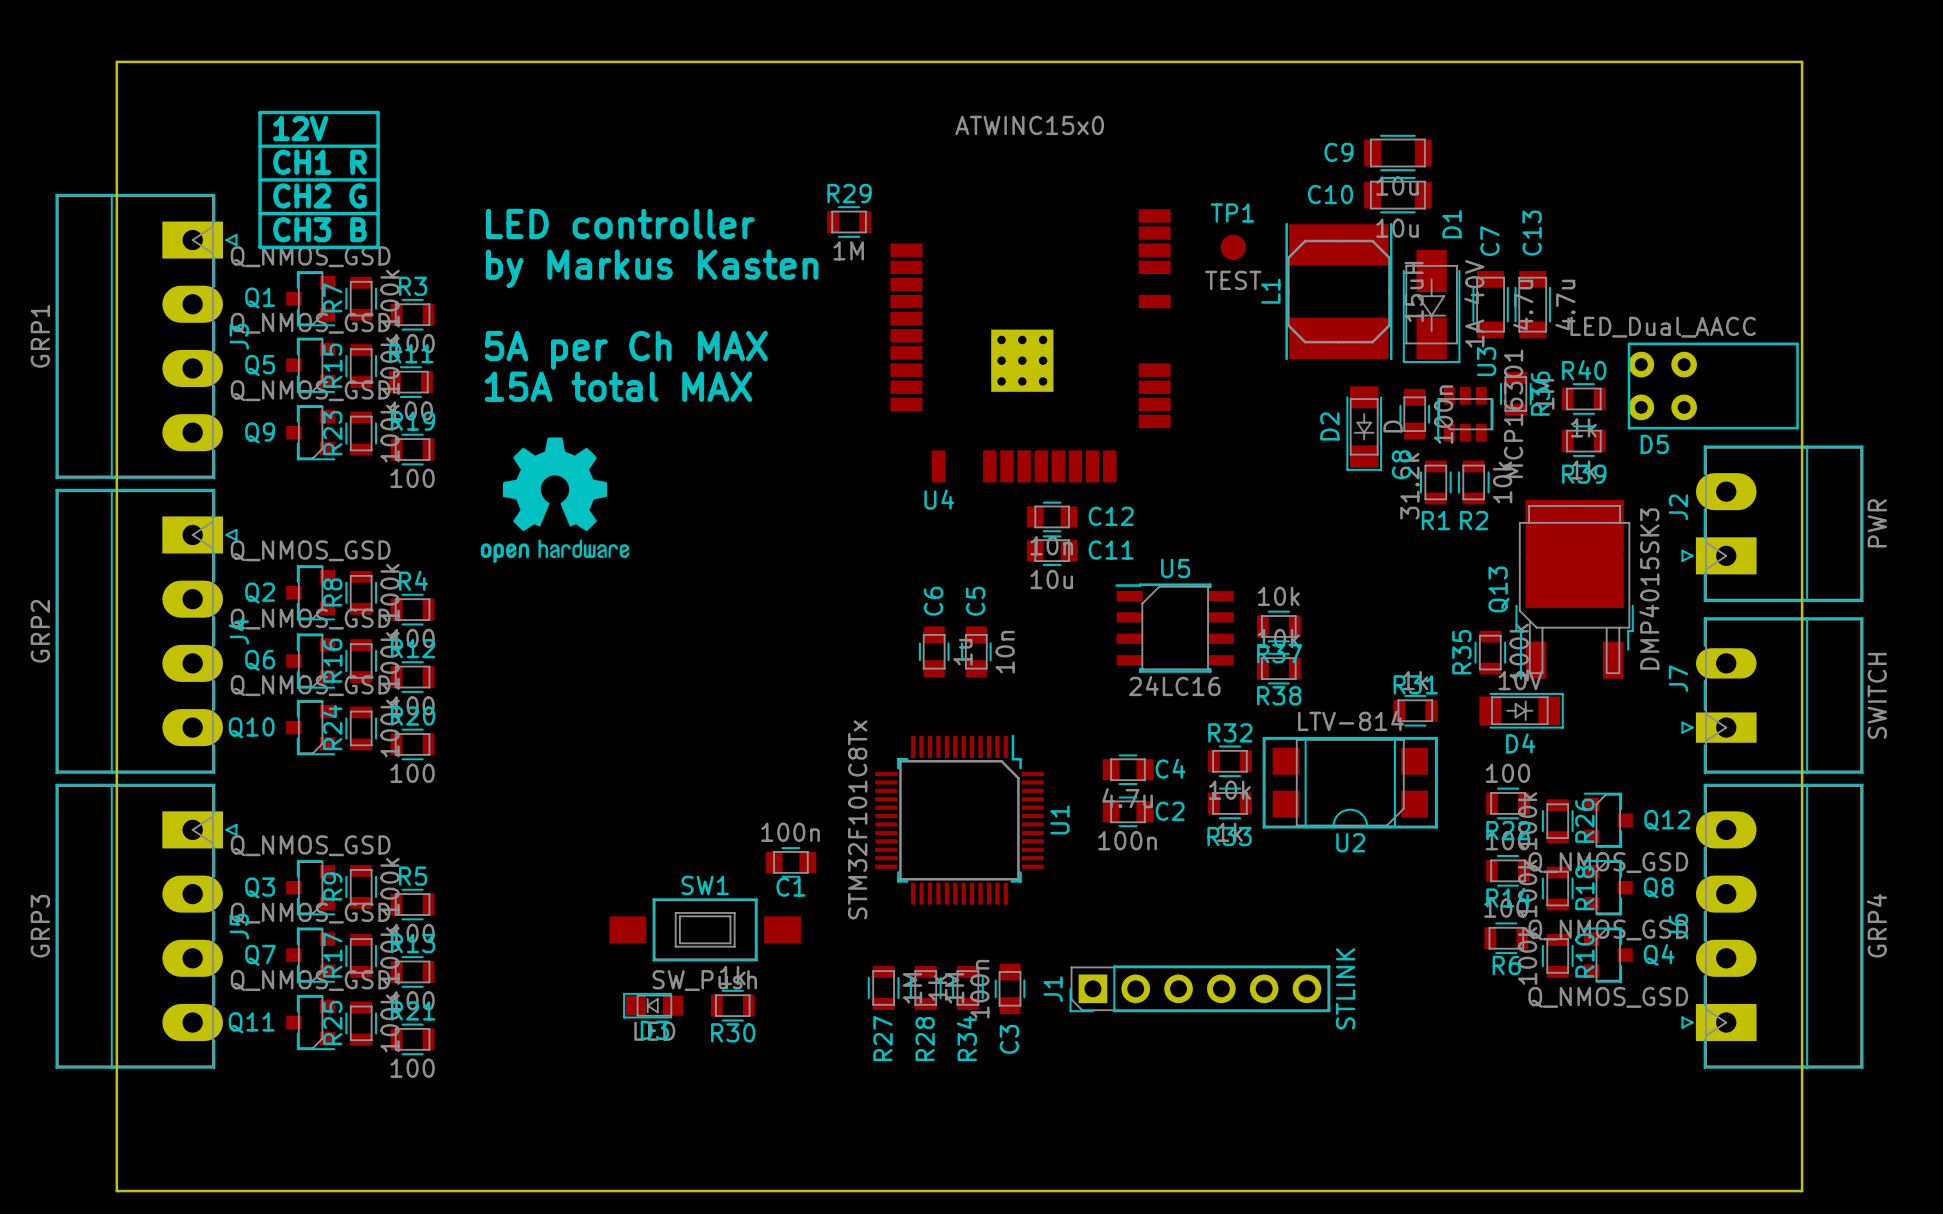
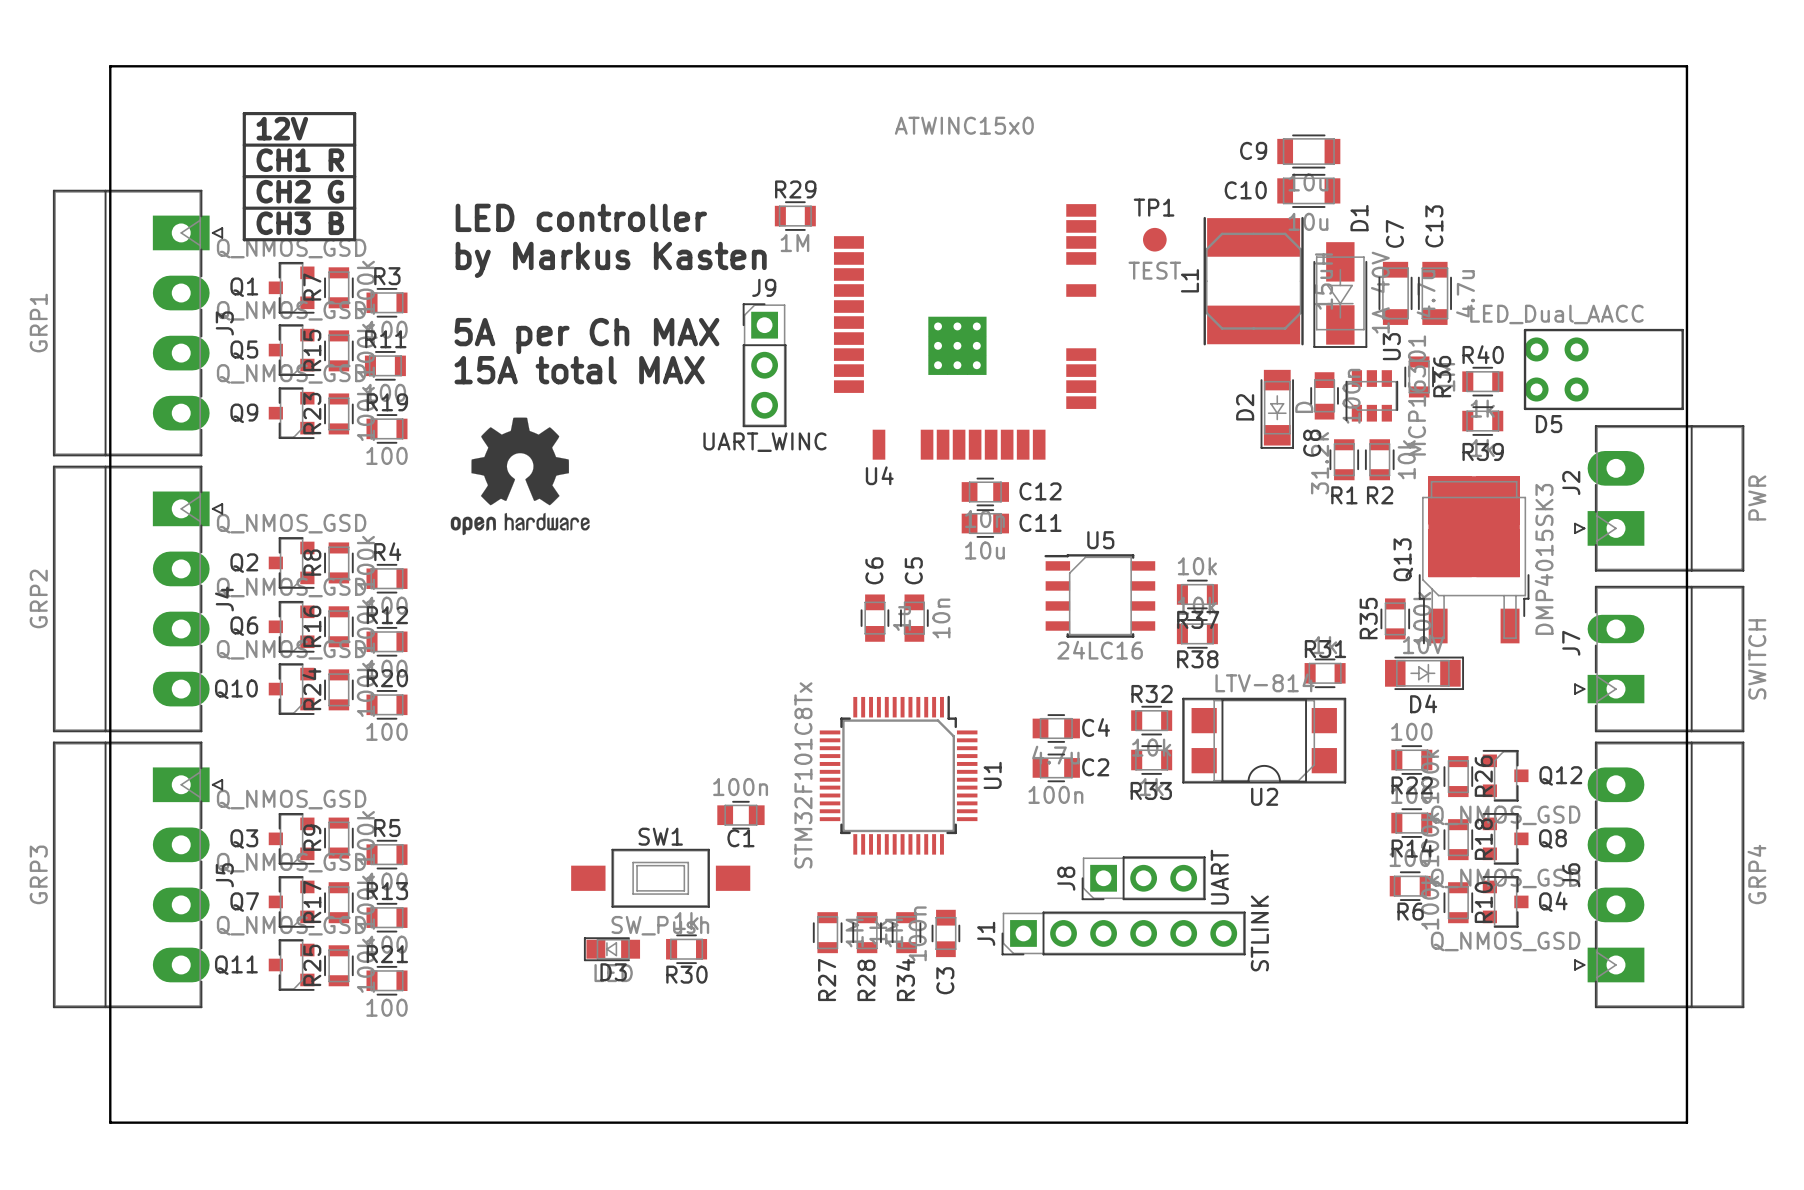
J9: none -> UART_WINC (764, 365)
J8: none -> UART (1143, 878)

